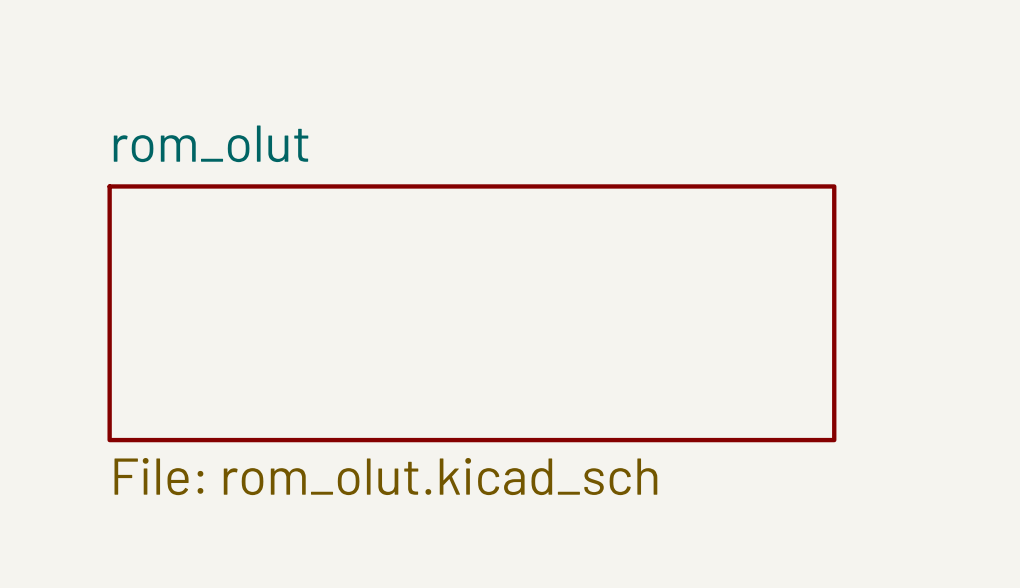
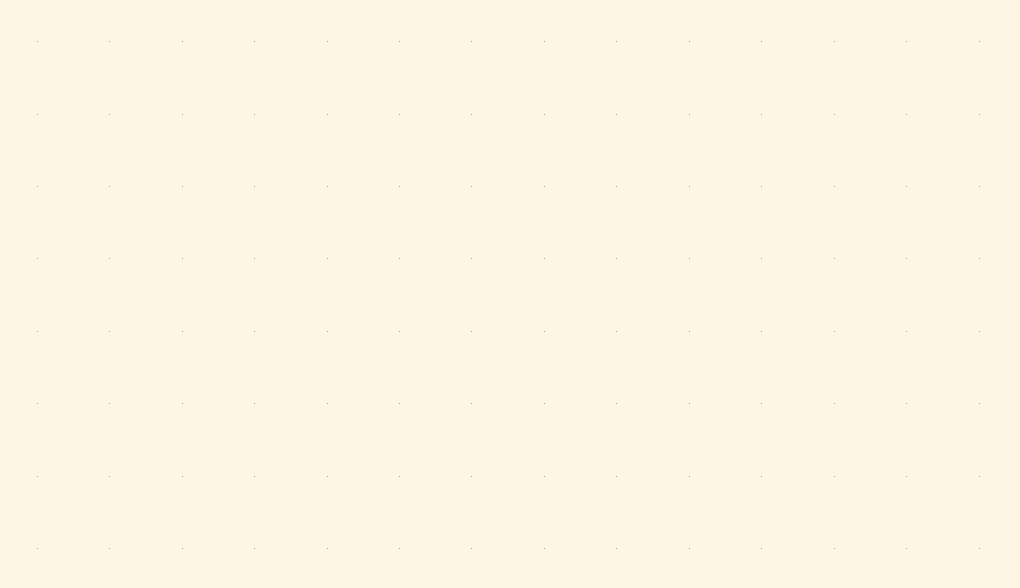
sheet rom_olut: File: rom_olut.kicad_sch (471, 313) -> none

